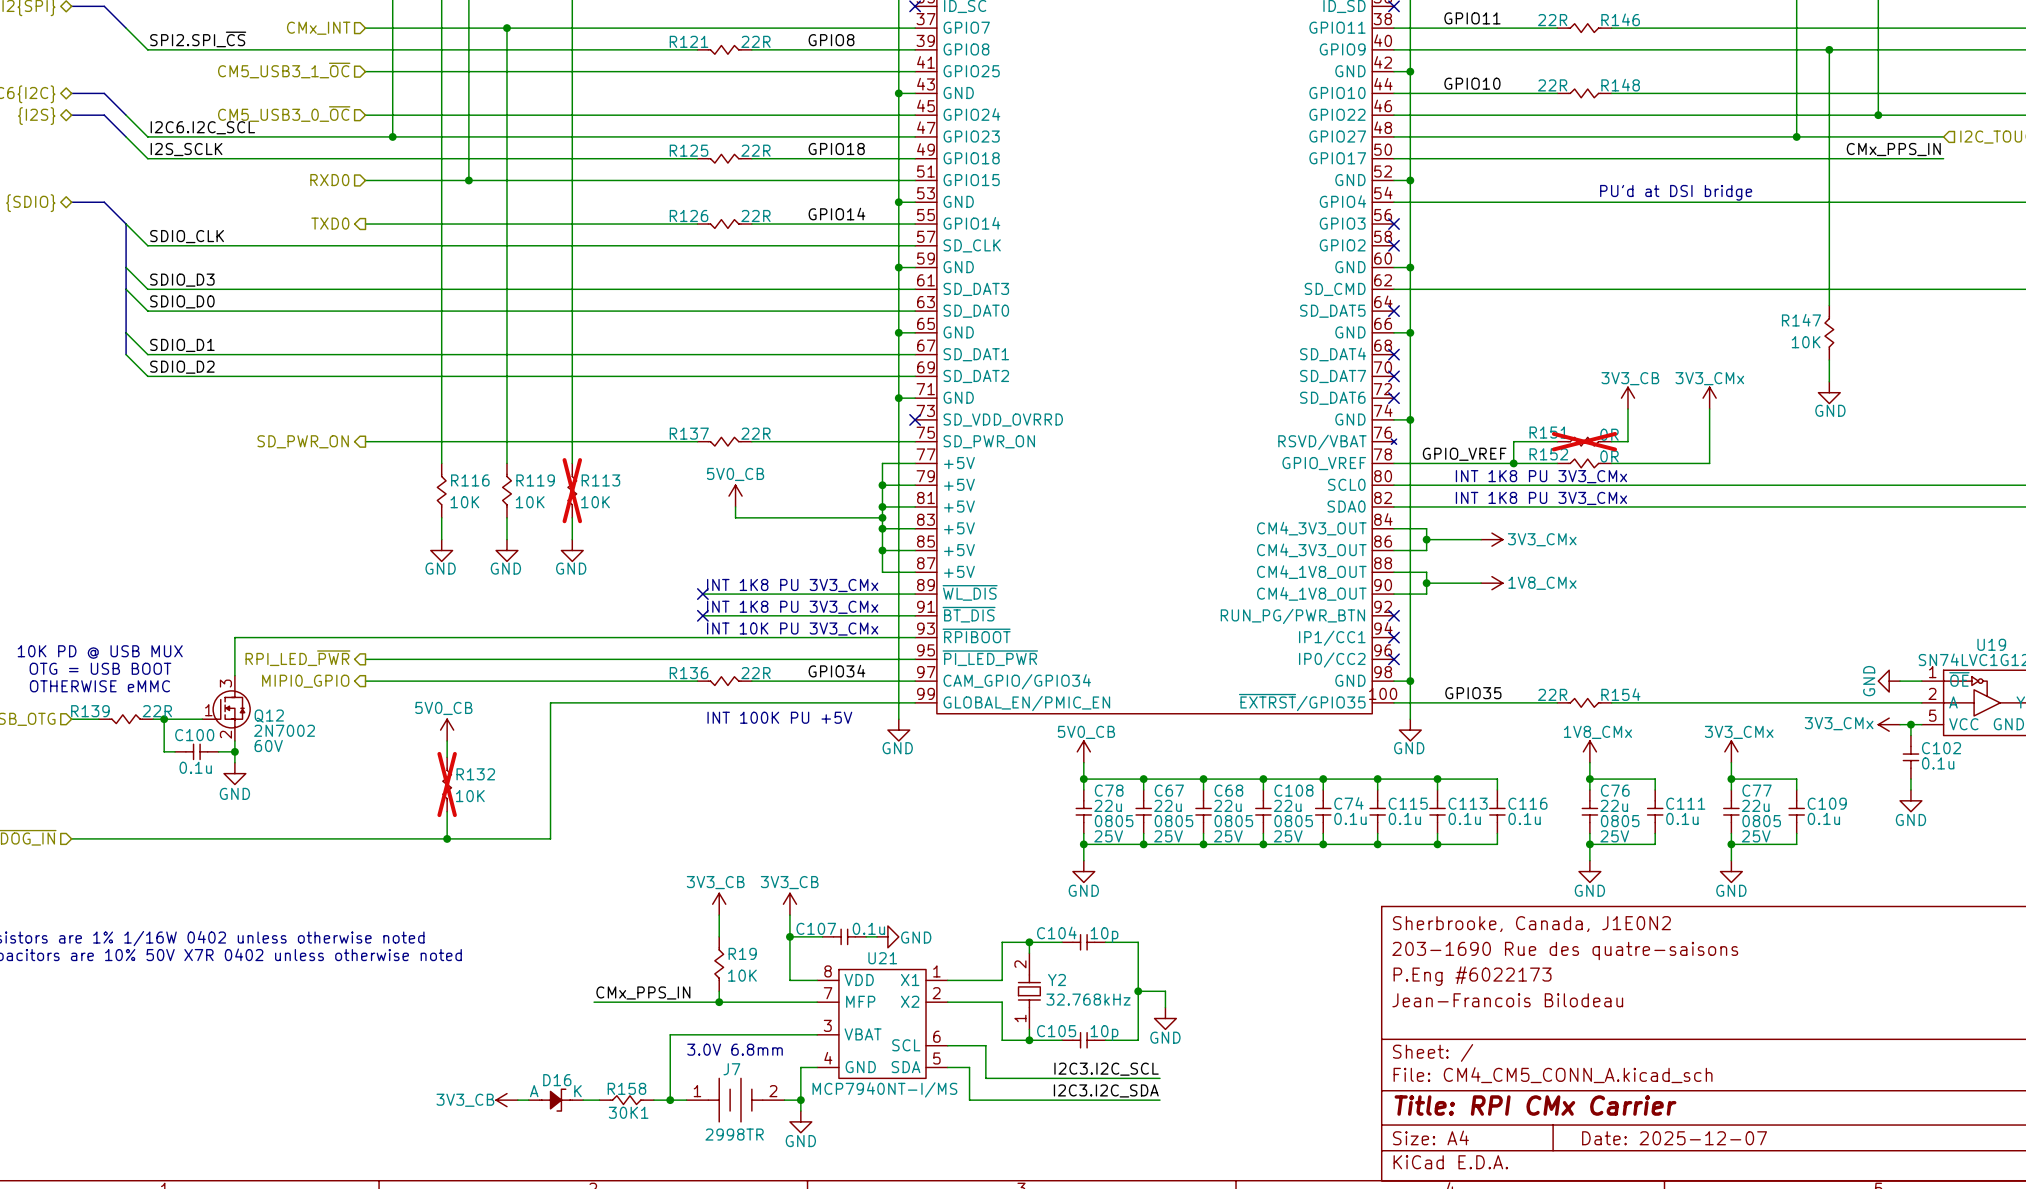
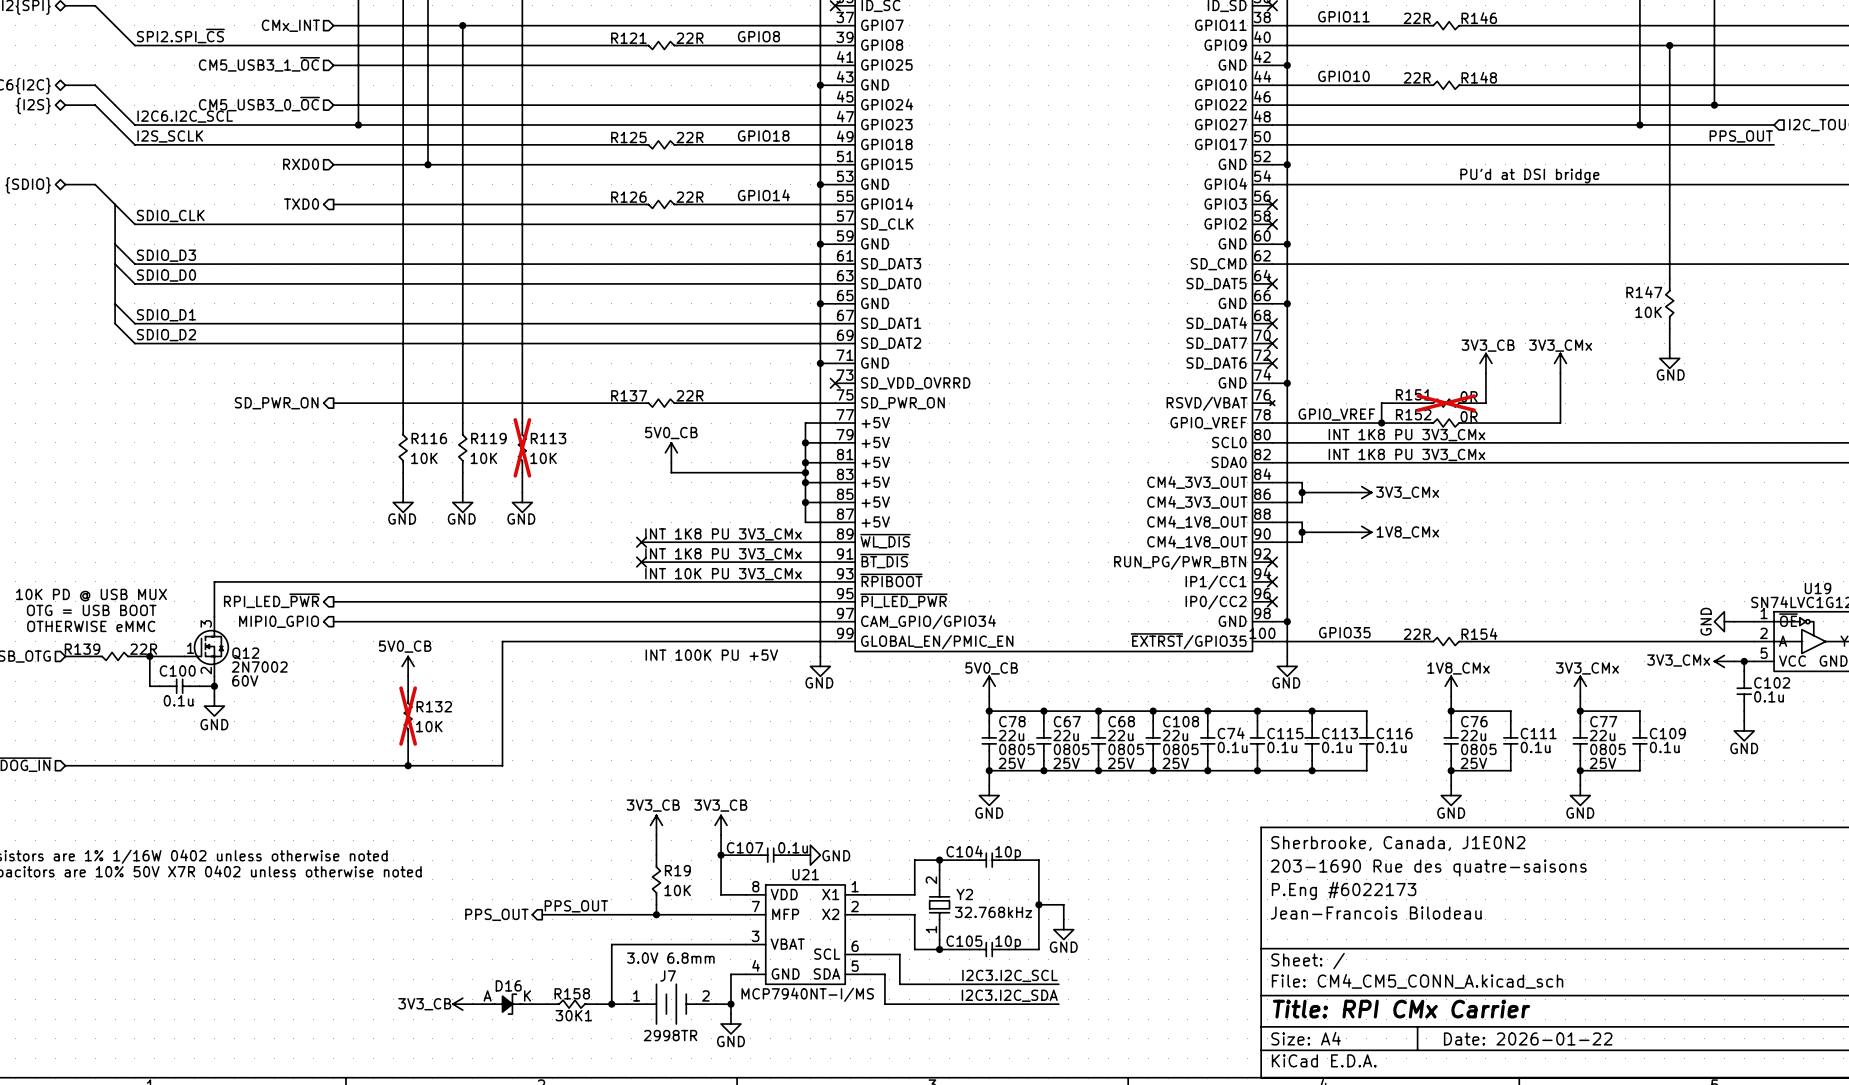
label: CMx_PPS_IN (1893, 149) -> PPS_OUT (1741, 136)
label: GPIO34 (836, 671) -> none
R136: 22R (724, 681) -> none
label: CMx_PPS_IN (643, 992) -> PPS_OUT (576, 906)
hierarchical label: none -> PPS_OUT (496, 914)
title block: Date: 2025-12-07 (1674, 1138) -> Date: 2026-01-22 (1528, 1038)

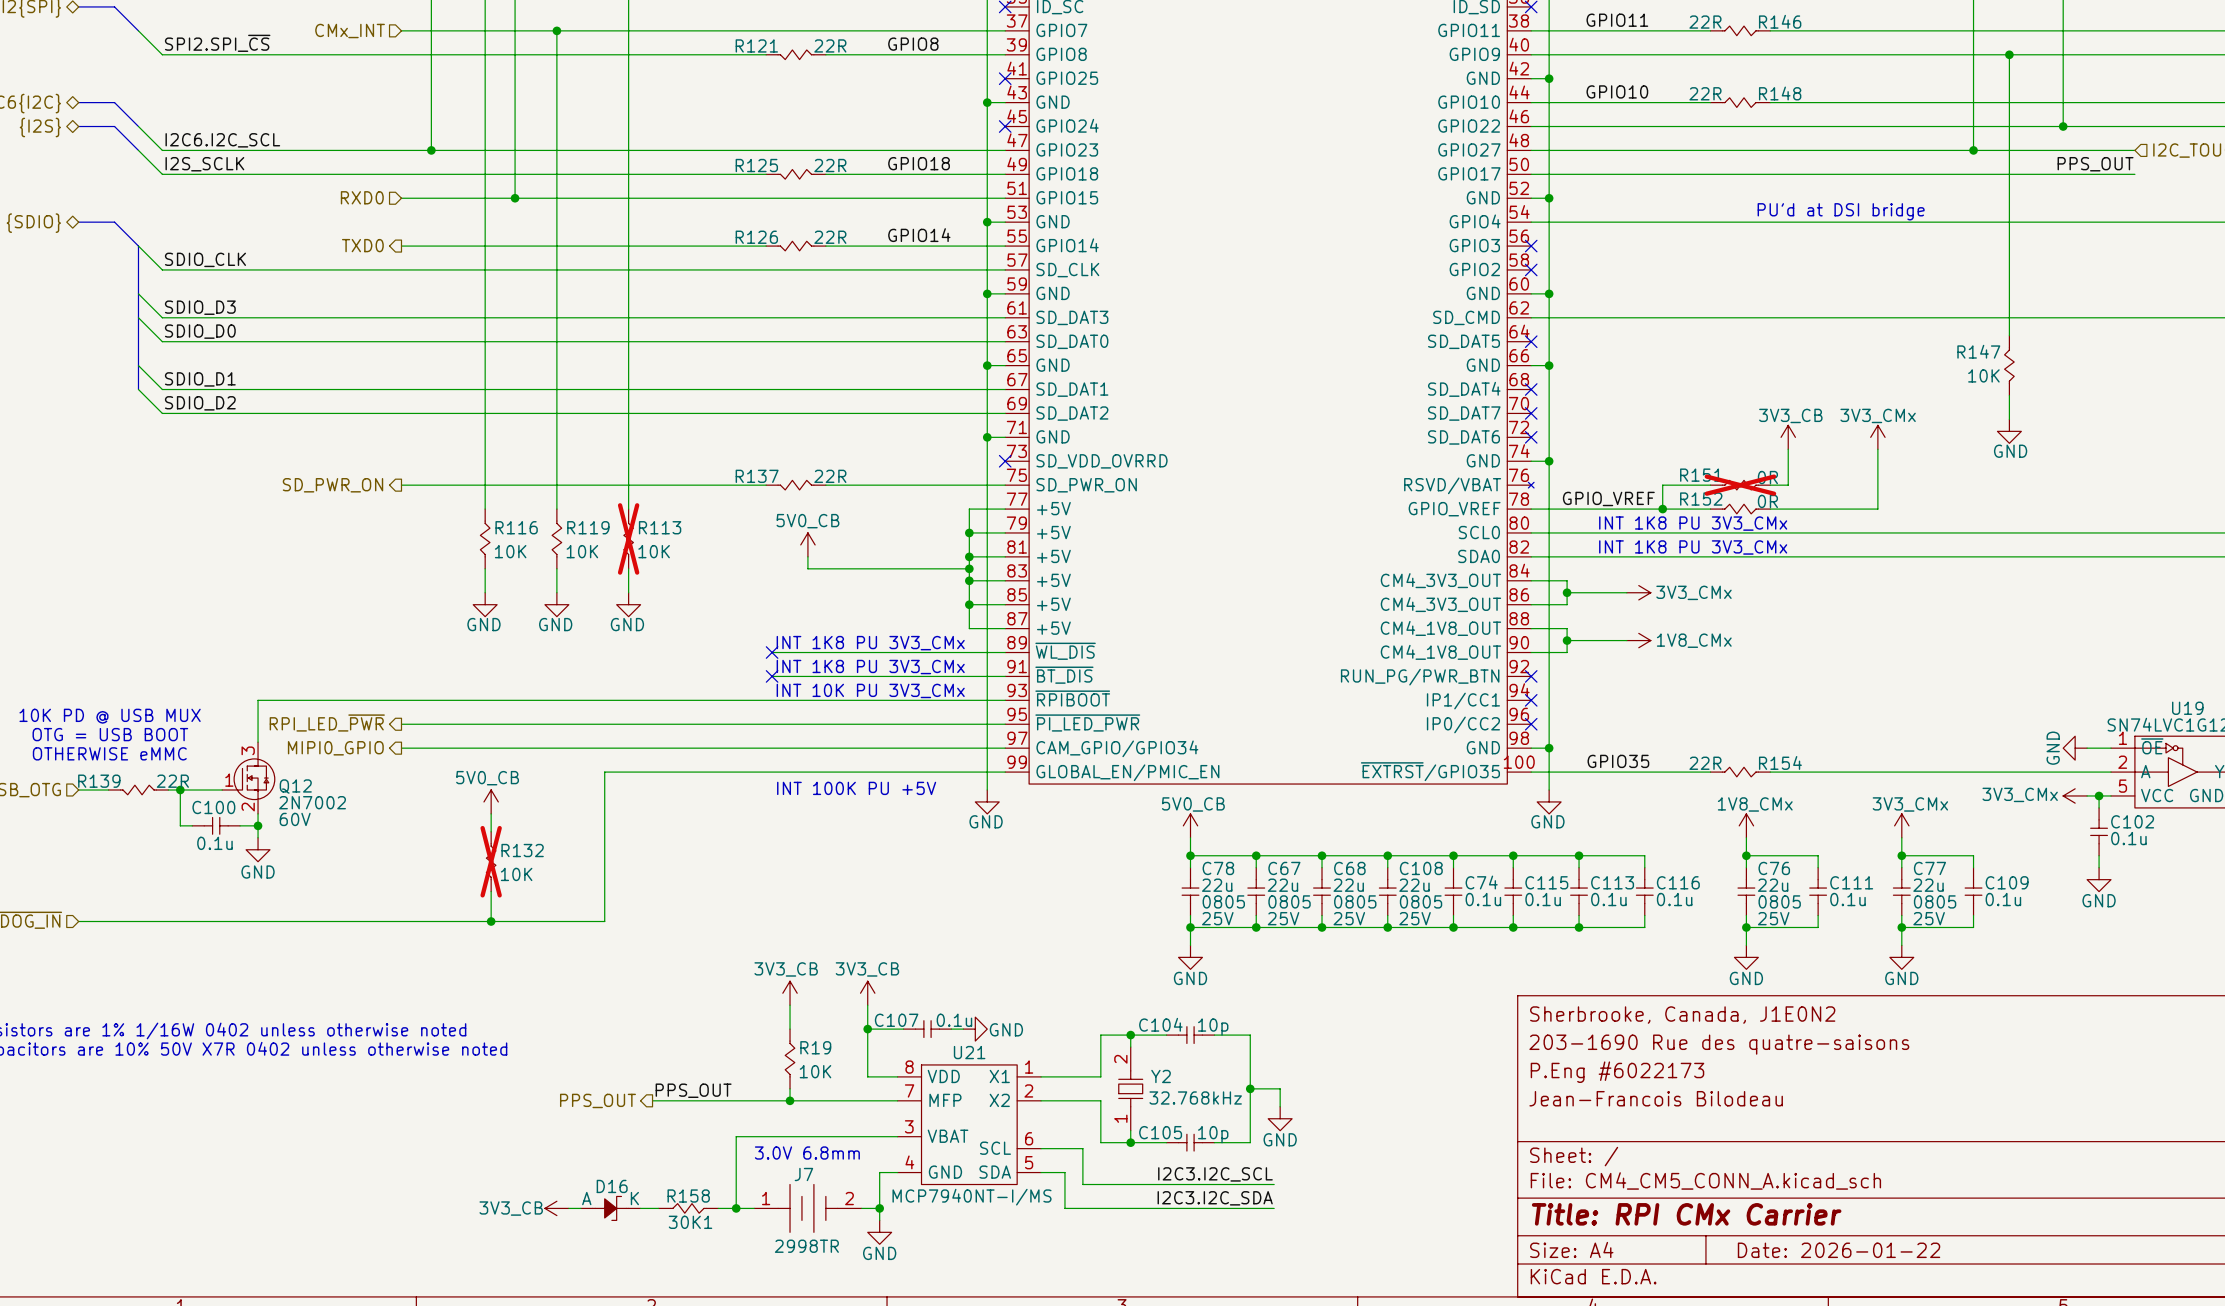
hierarchical label: CM5_USB3_1_~{OC} (259, 64) -> none
wire: (333, 65) (835, 65) -> none
no-connect mark: none -> (1005, 78)
hierarchical label: CM5_USB3_0_~{OC} (259, 104) -> none
wire: (333, 105) (835, 105) -> none
no-connect mark: none -> (1005, 126)

